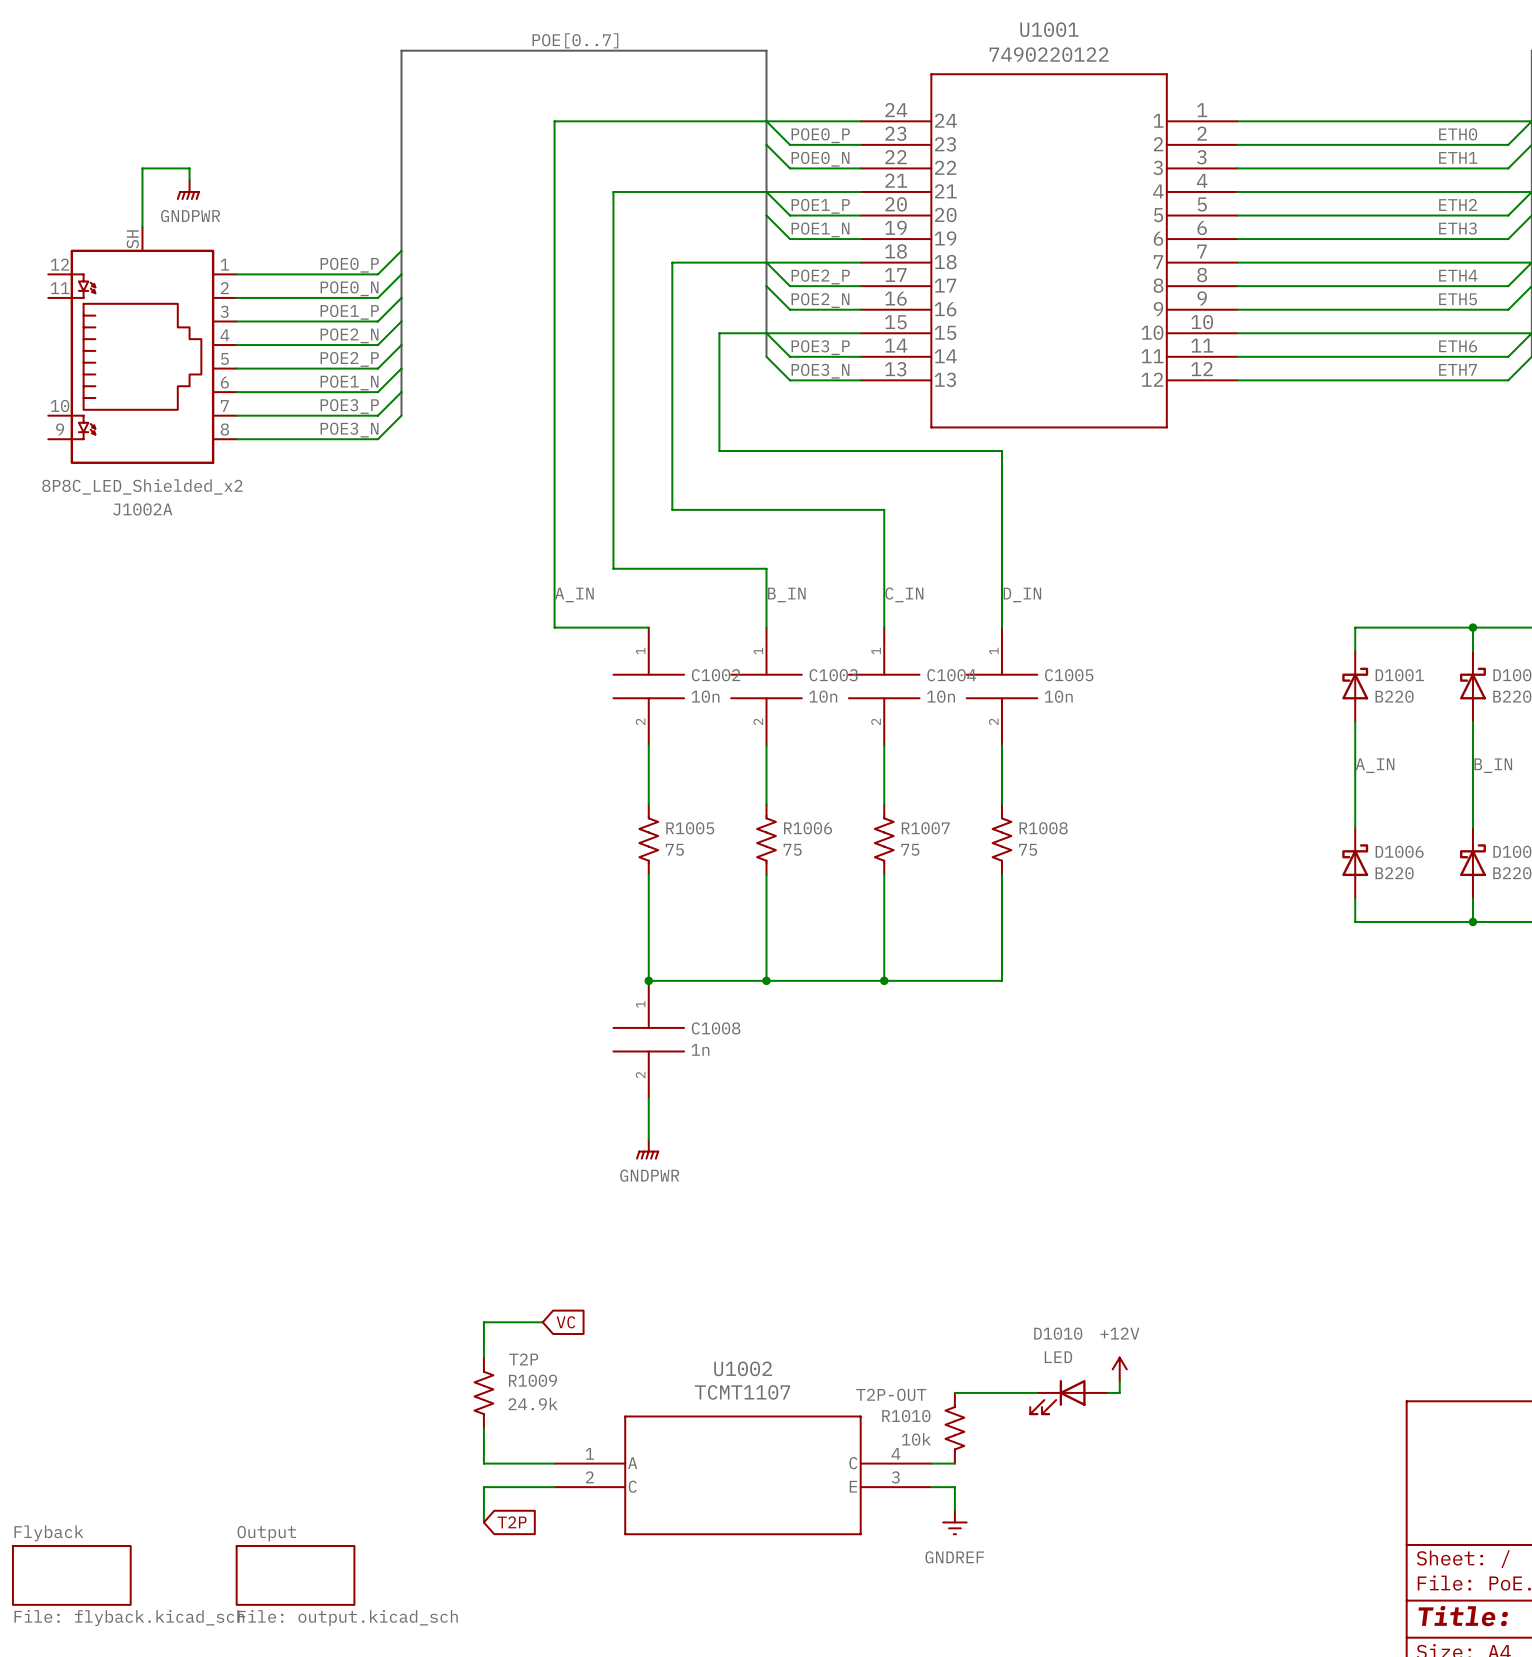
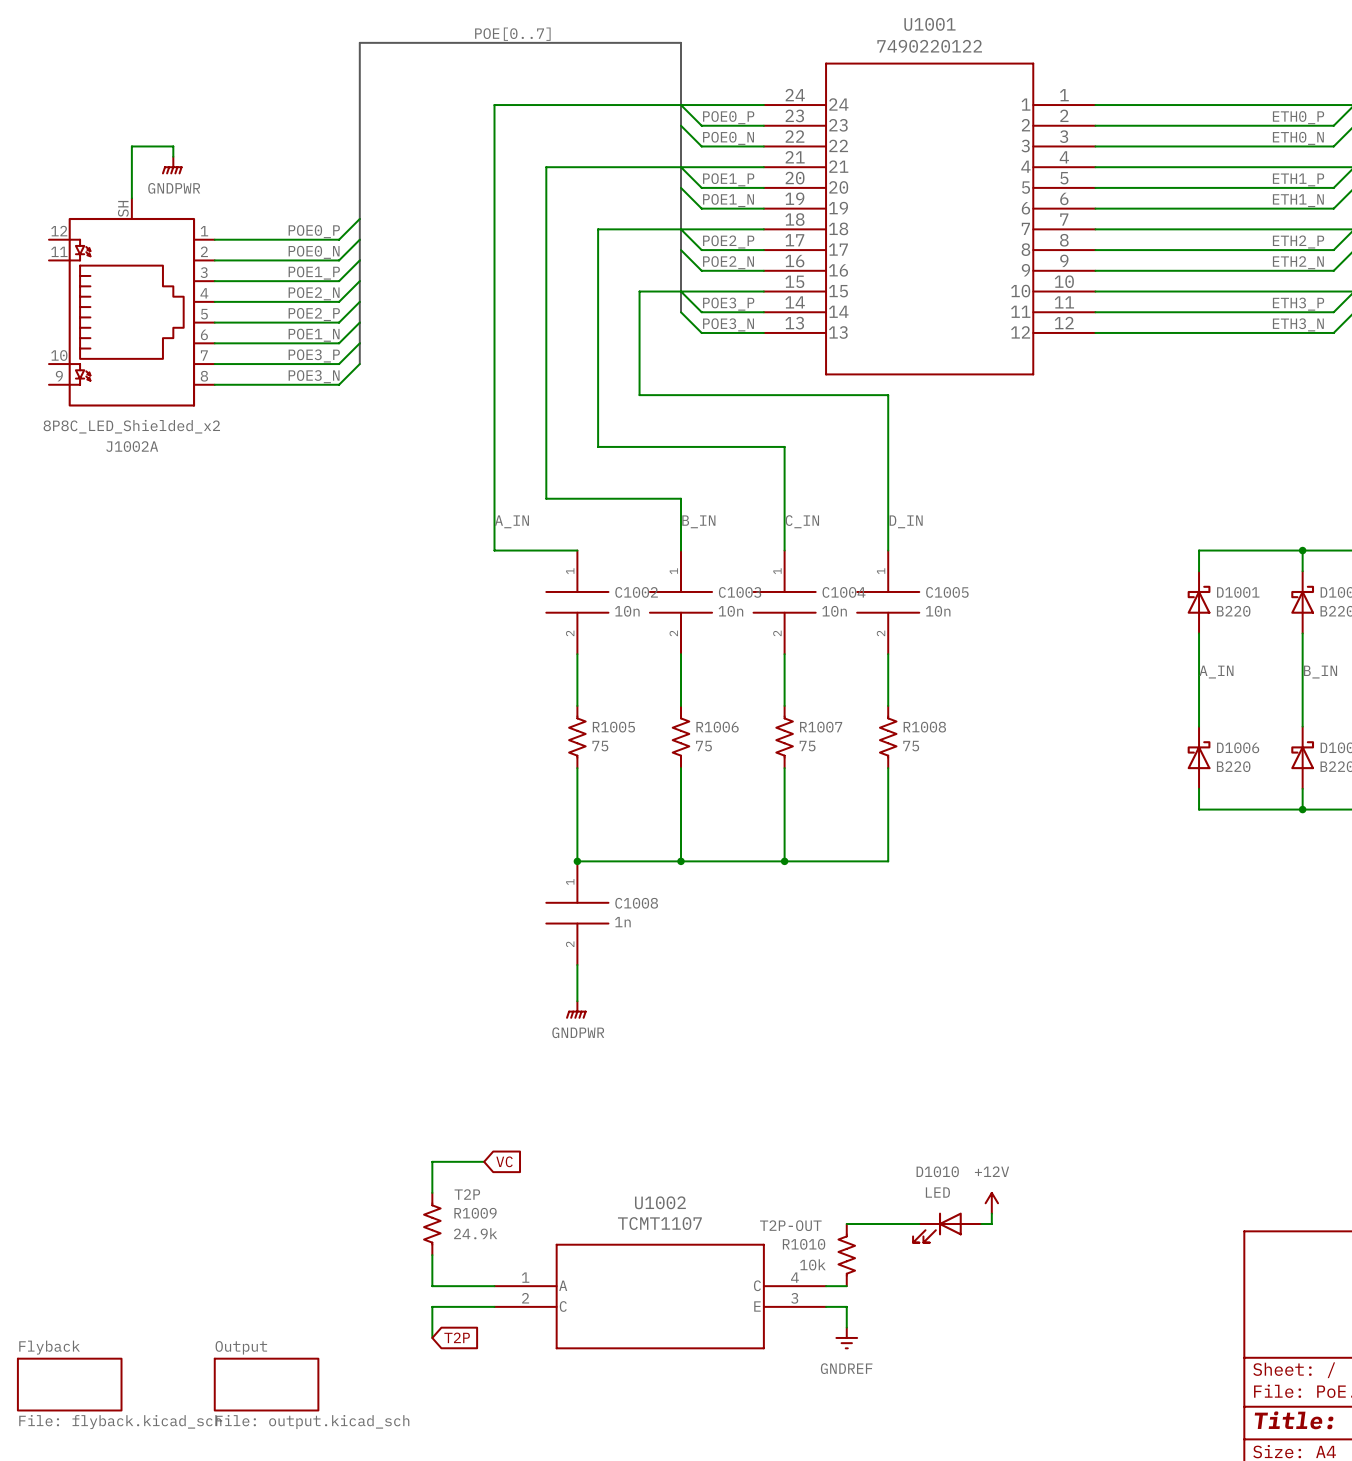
label: ETH0 (1458, 134) -> ETH0_P (1298, 117)
label: ETH1 (1458, 157) -> ETH0_N (1298, 138)
label: ETH2 (1458, 204) -> ETH1_P (1298, 179)
label: ETH3 (1457, 228) -> ETH1_N (1298, 200)
label: ETH4 (1458, 275) -> ETH2_P (1298, 242)
label: ETH5 (1458, 299) -> ETH2_N (1298, 262)
label: ETH6 (1458, 346) -> ETH3_P (1298, 304)
label: ETH7 (1458, 369) -> ETH3_N (1298, 324)

